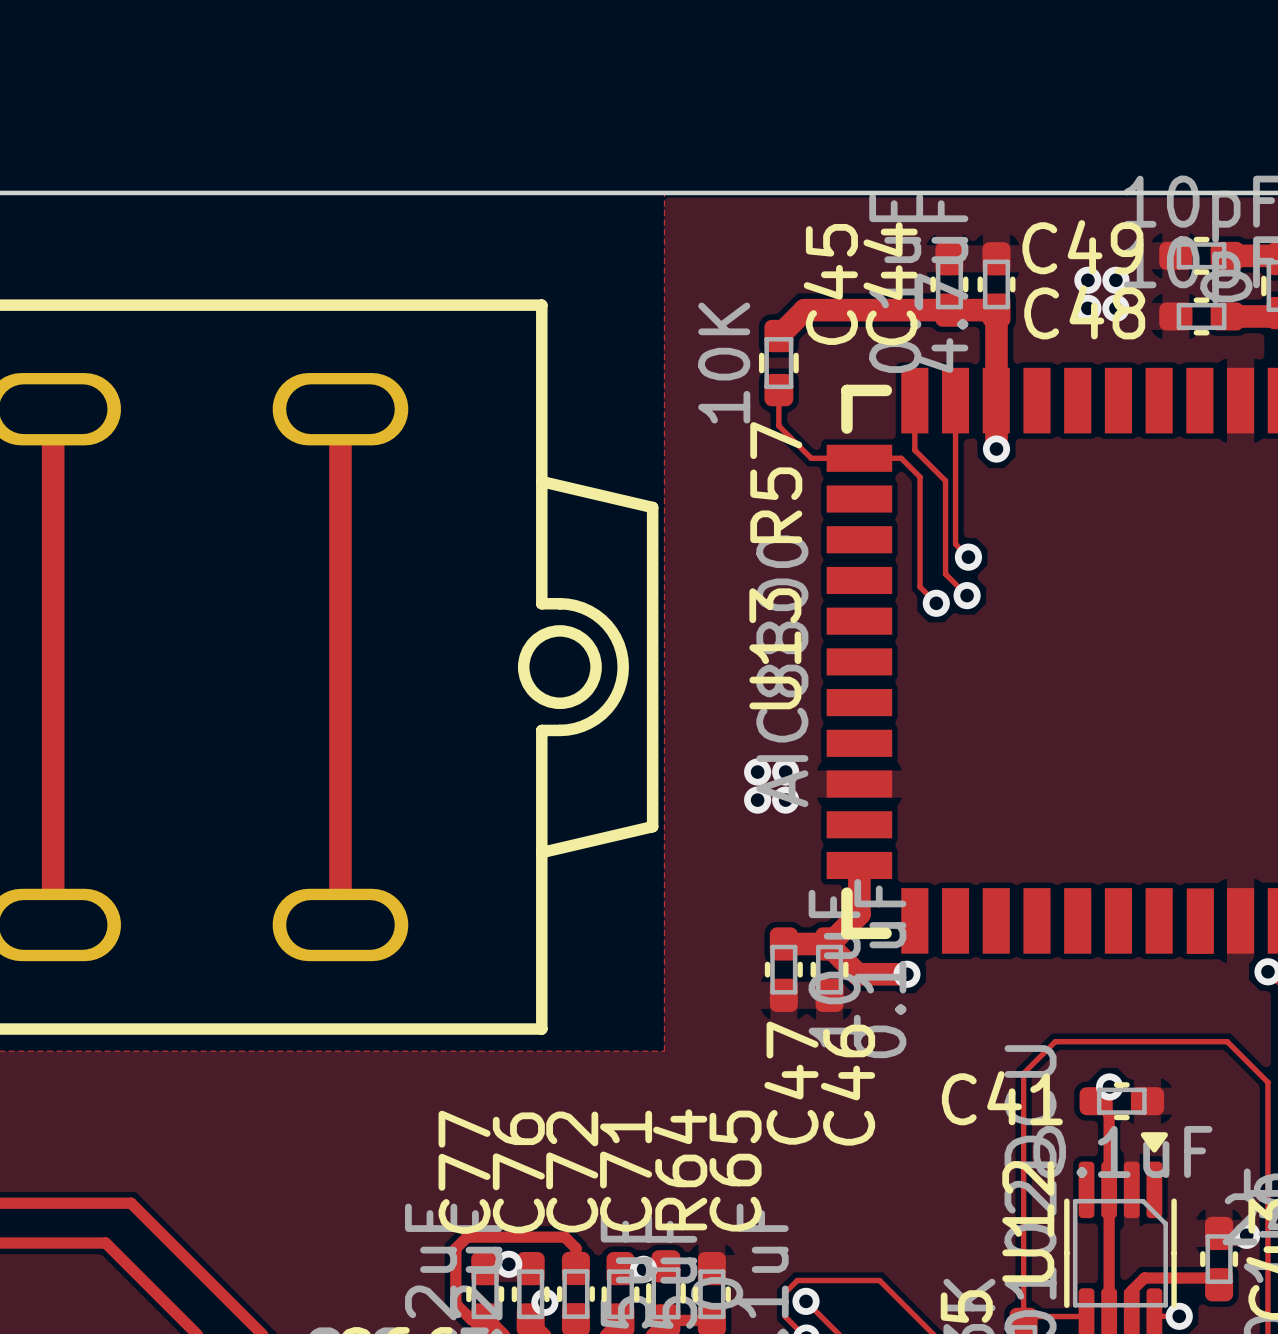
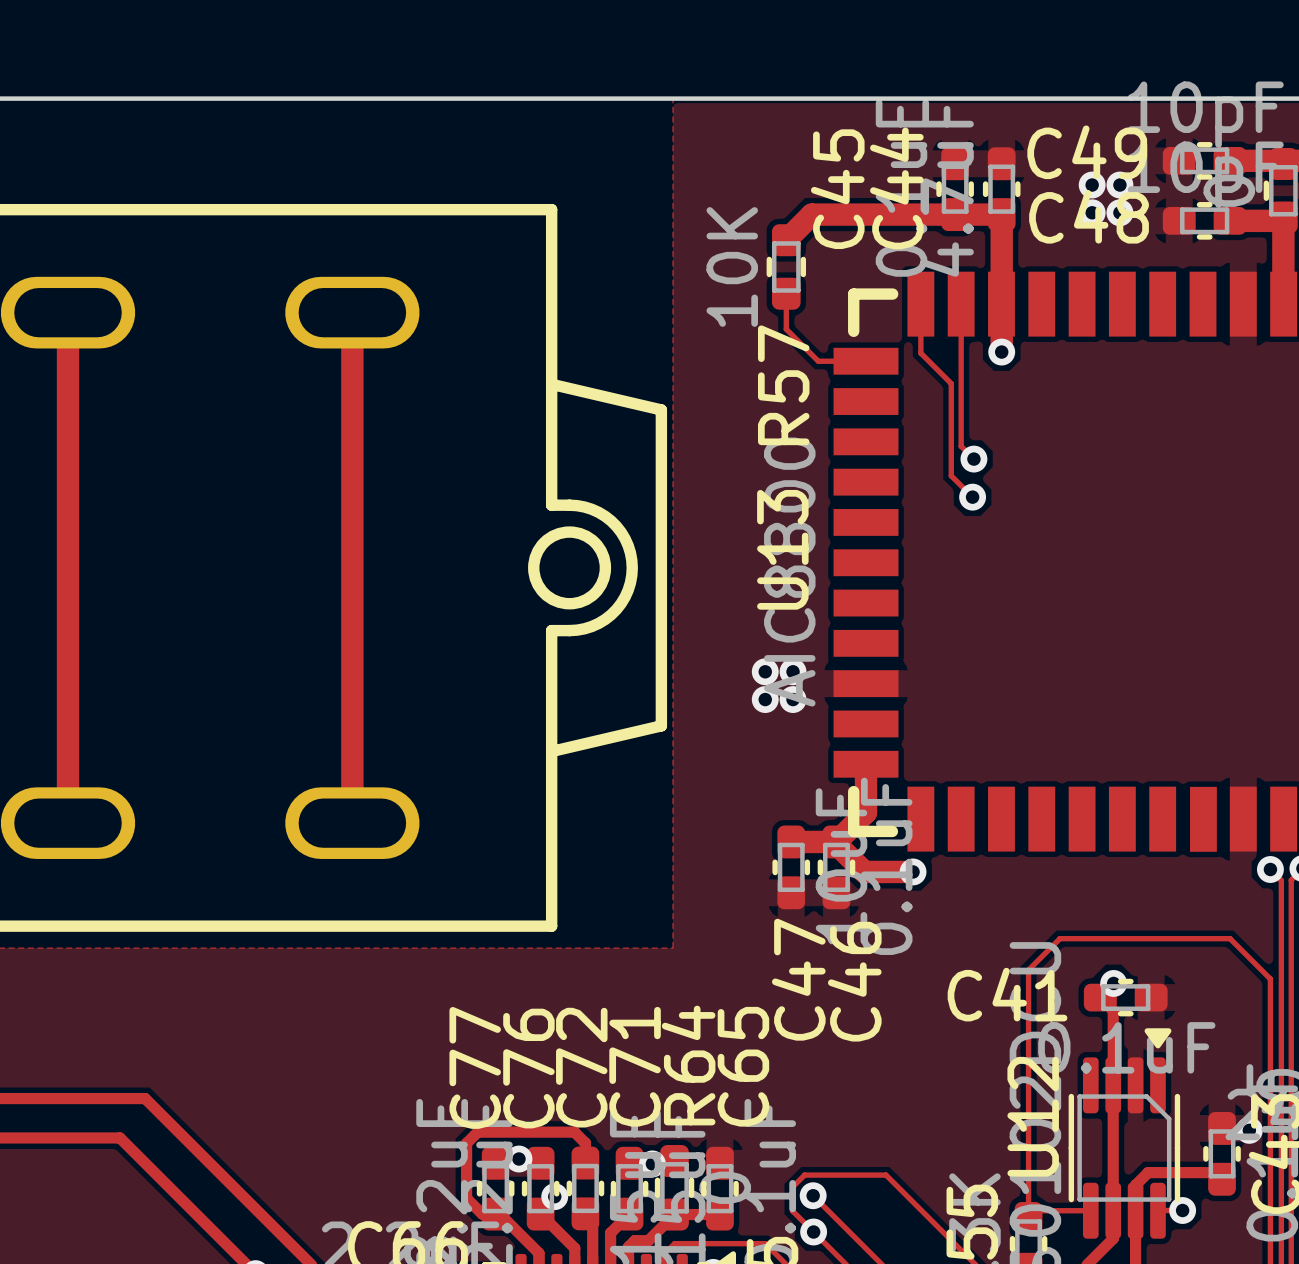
track: (859, 458) (901, 458) (920, 477) (920, 587) (936, 603) -> none
via: (936, 603) -> none

